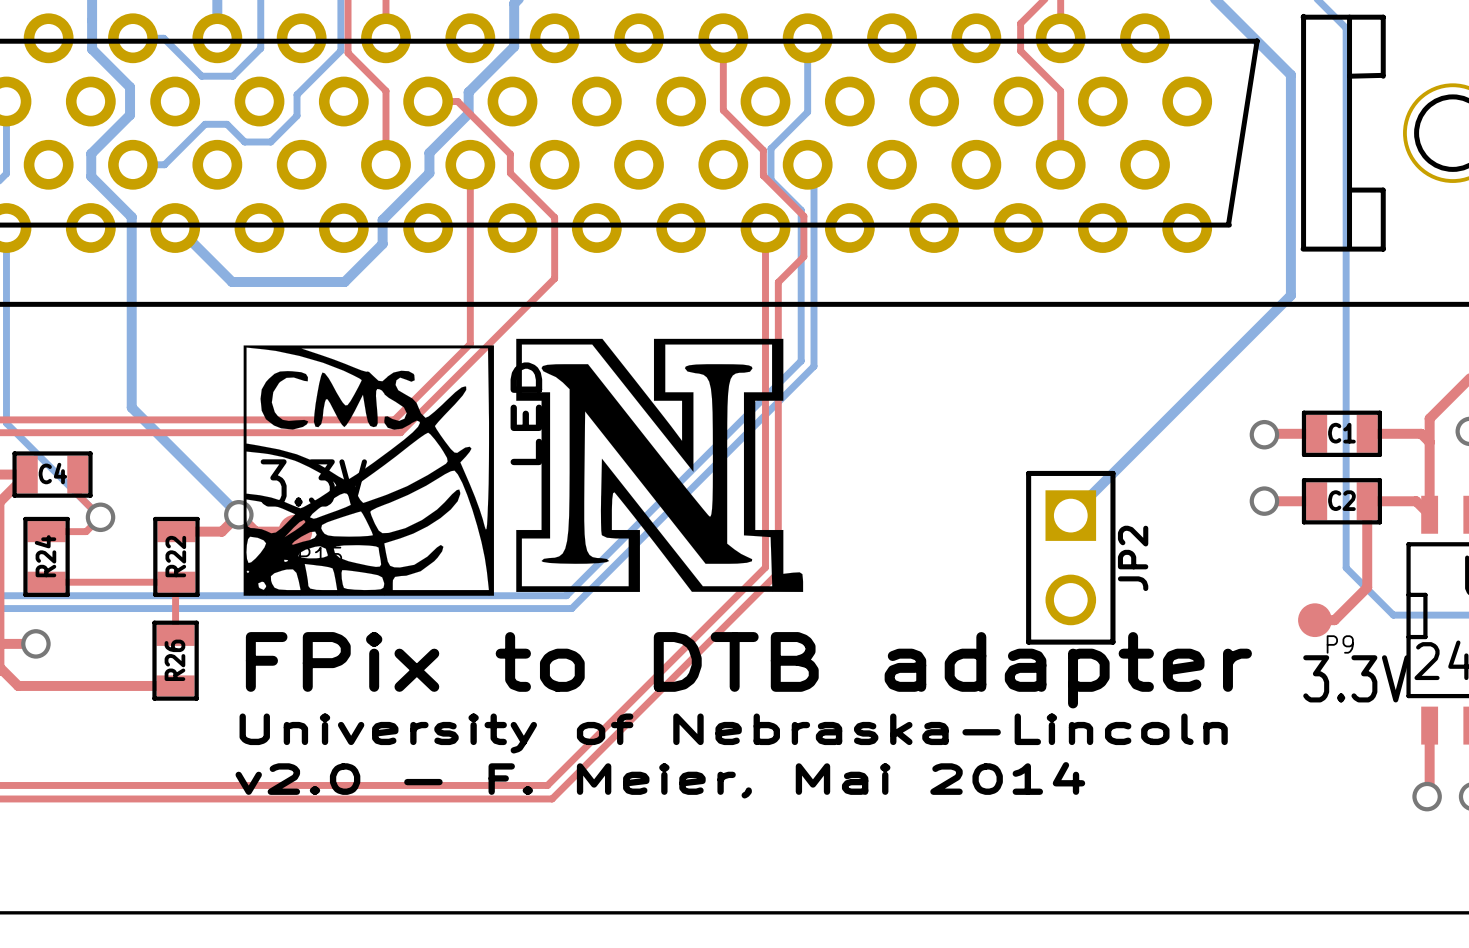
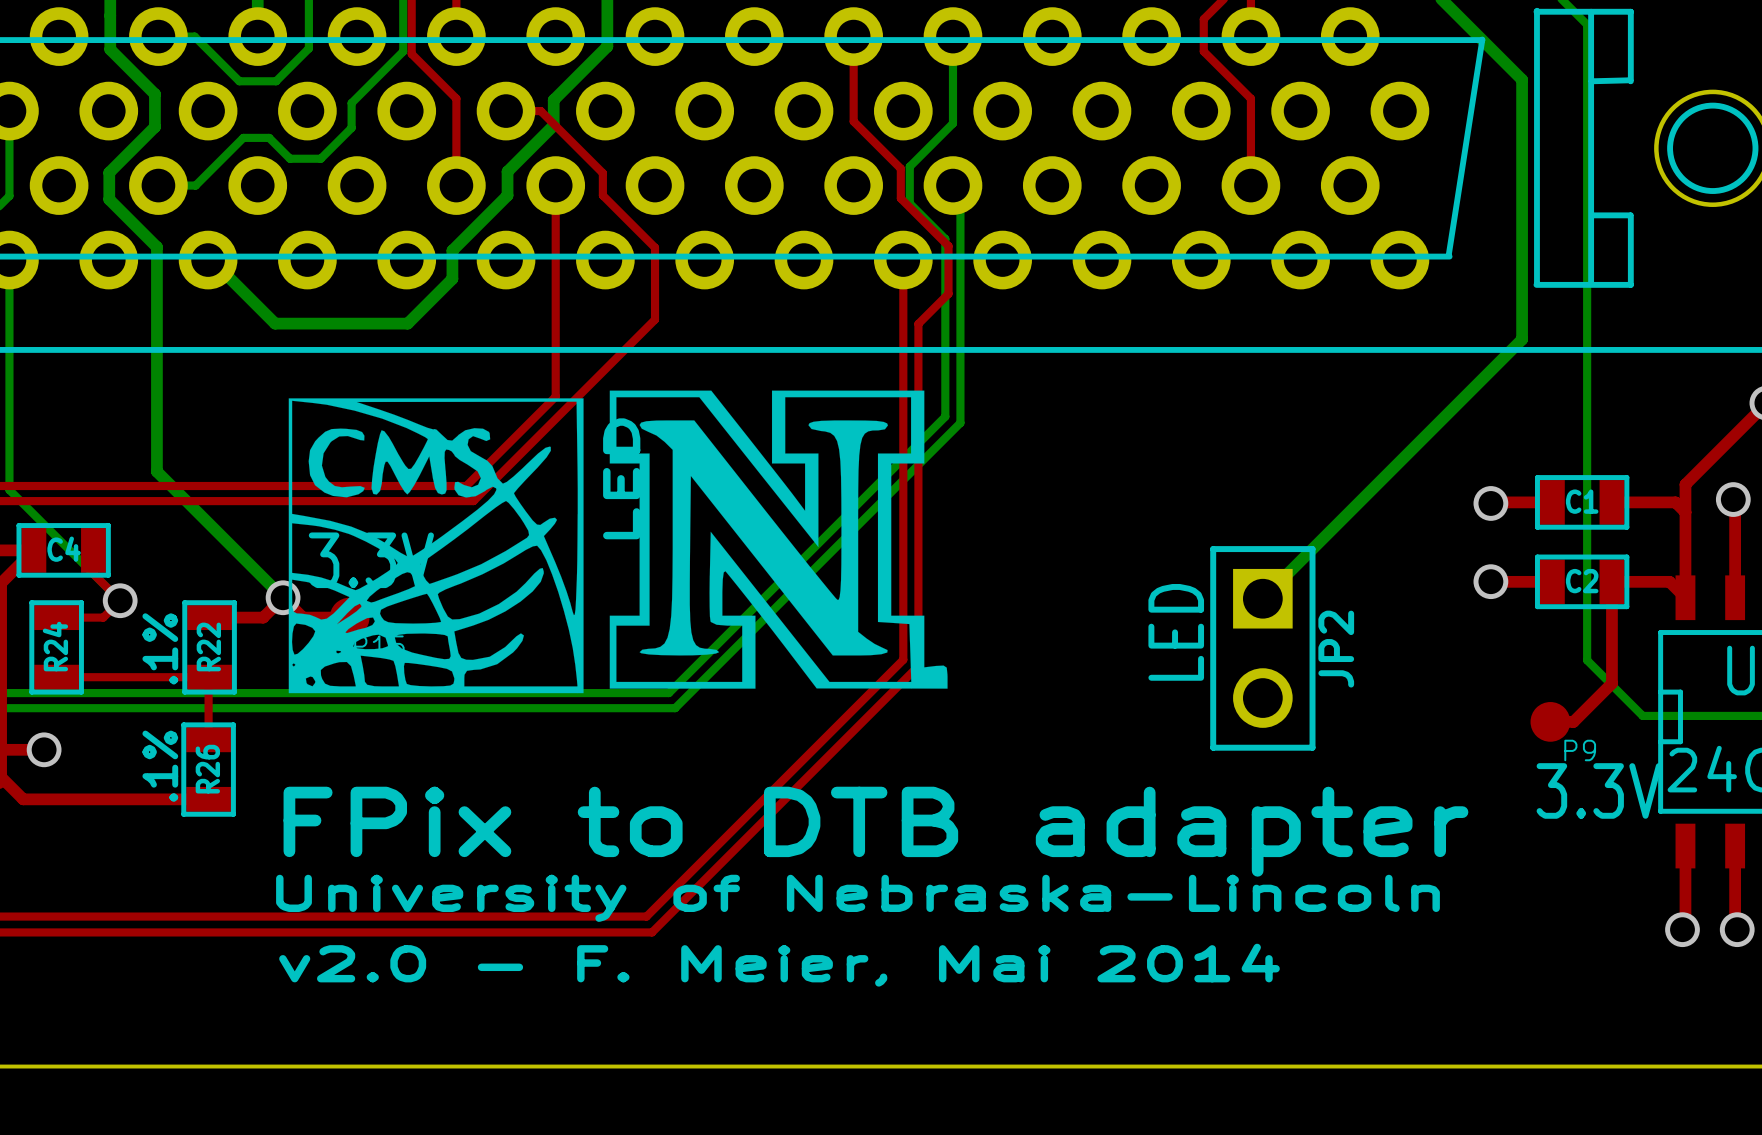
text: none -> LED (1176, 632)
text: none -> .1% (160, 648)
text: none -> .1% (160, 766)
text position: FPix to DTB adapter (748, 670) -> FPix to DTB adapter (875, 831)
text position: University of Nebraska-Lincoln (733, 733) -> University of Nebraska-Lincoln (857, 898)
text position: v2.0 - F. Meier, Mai 2014 (660, 780) -> v2.0 - F. Meier, Mai 2014 (779, 965)

